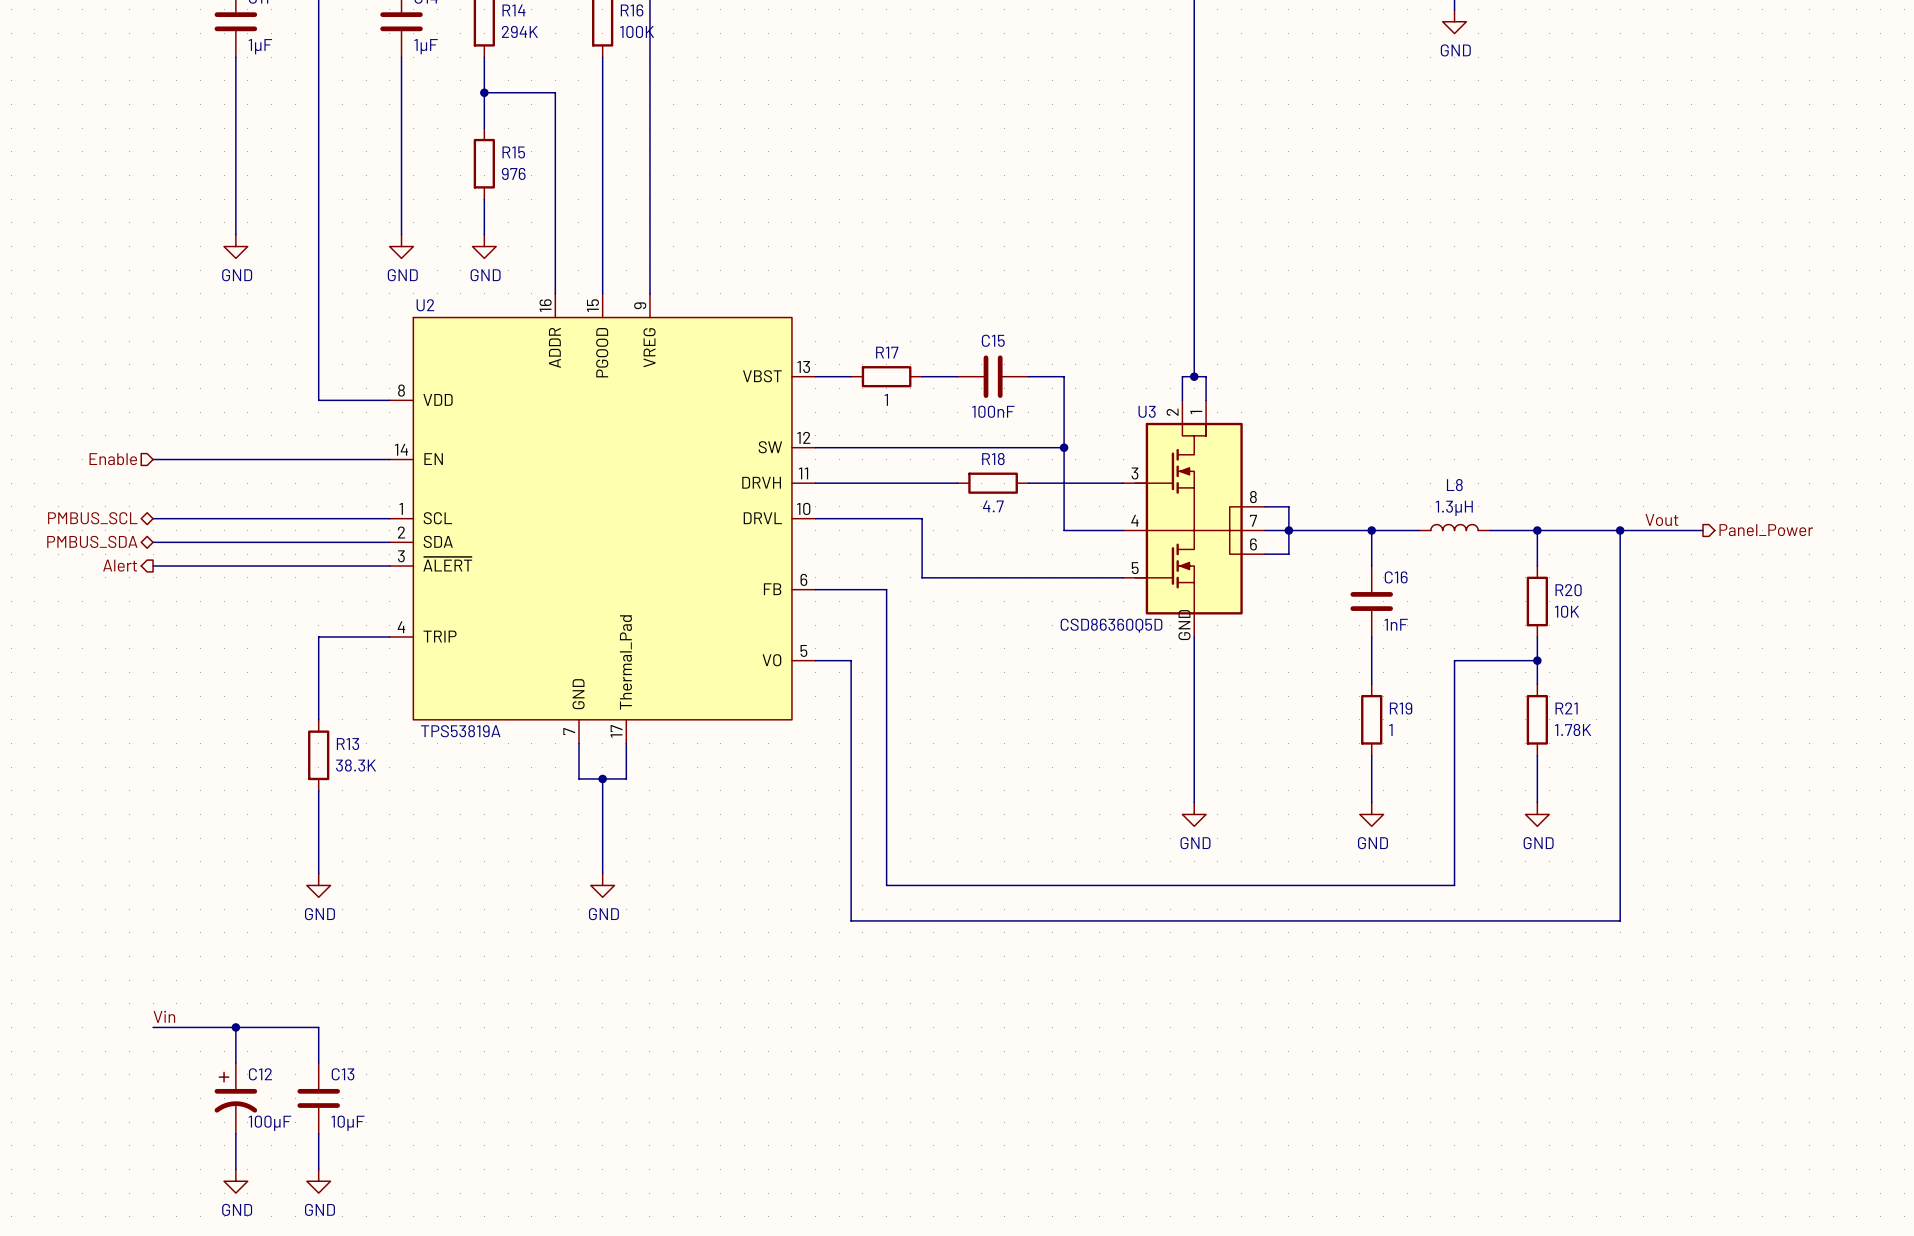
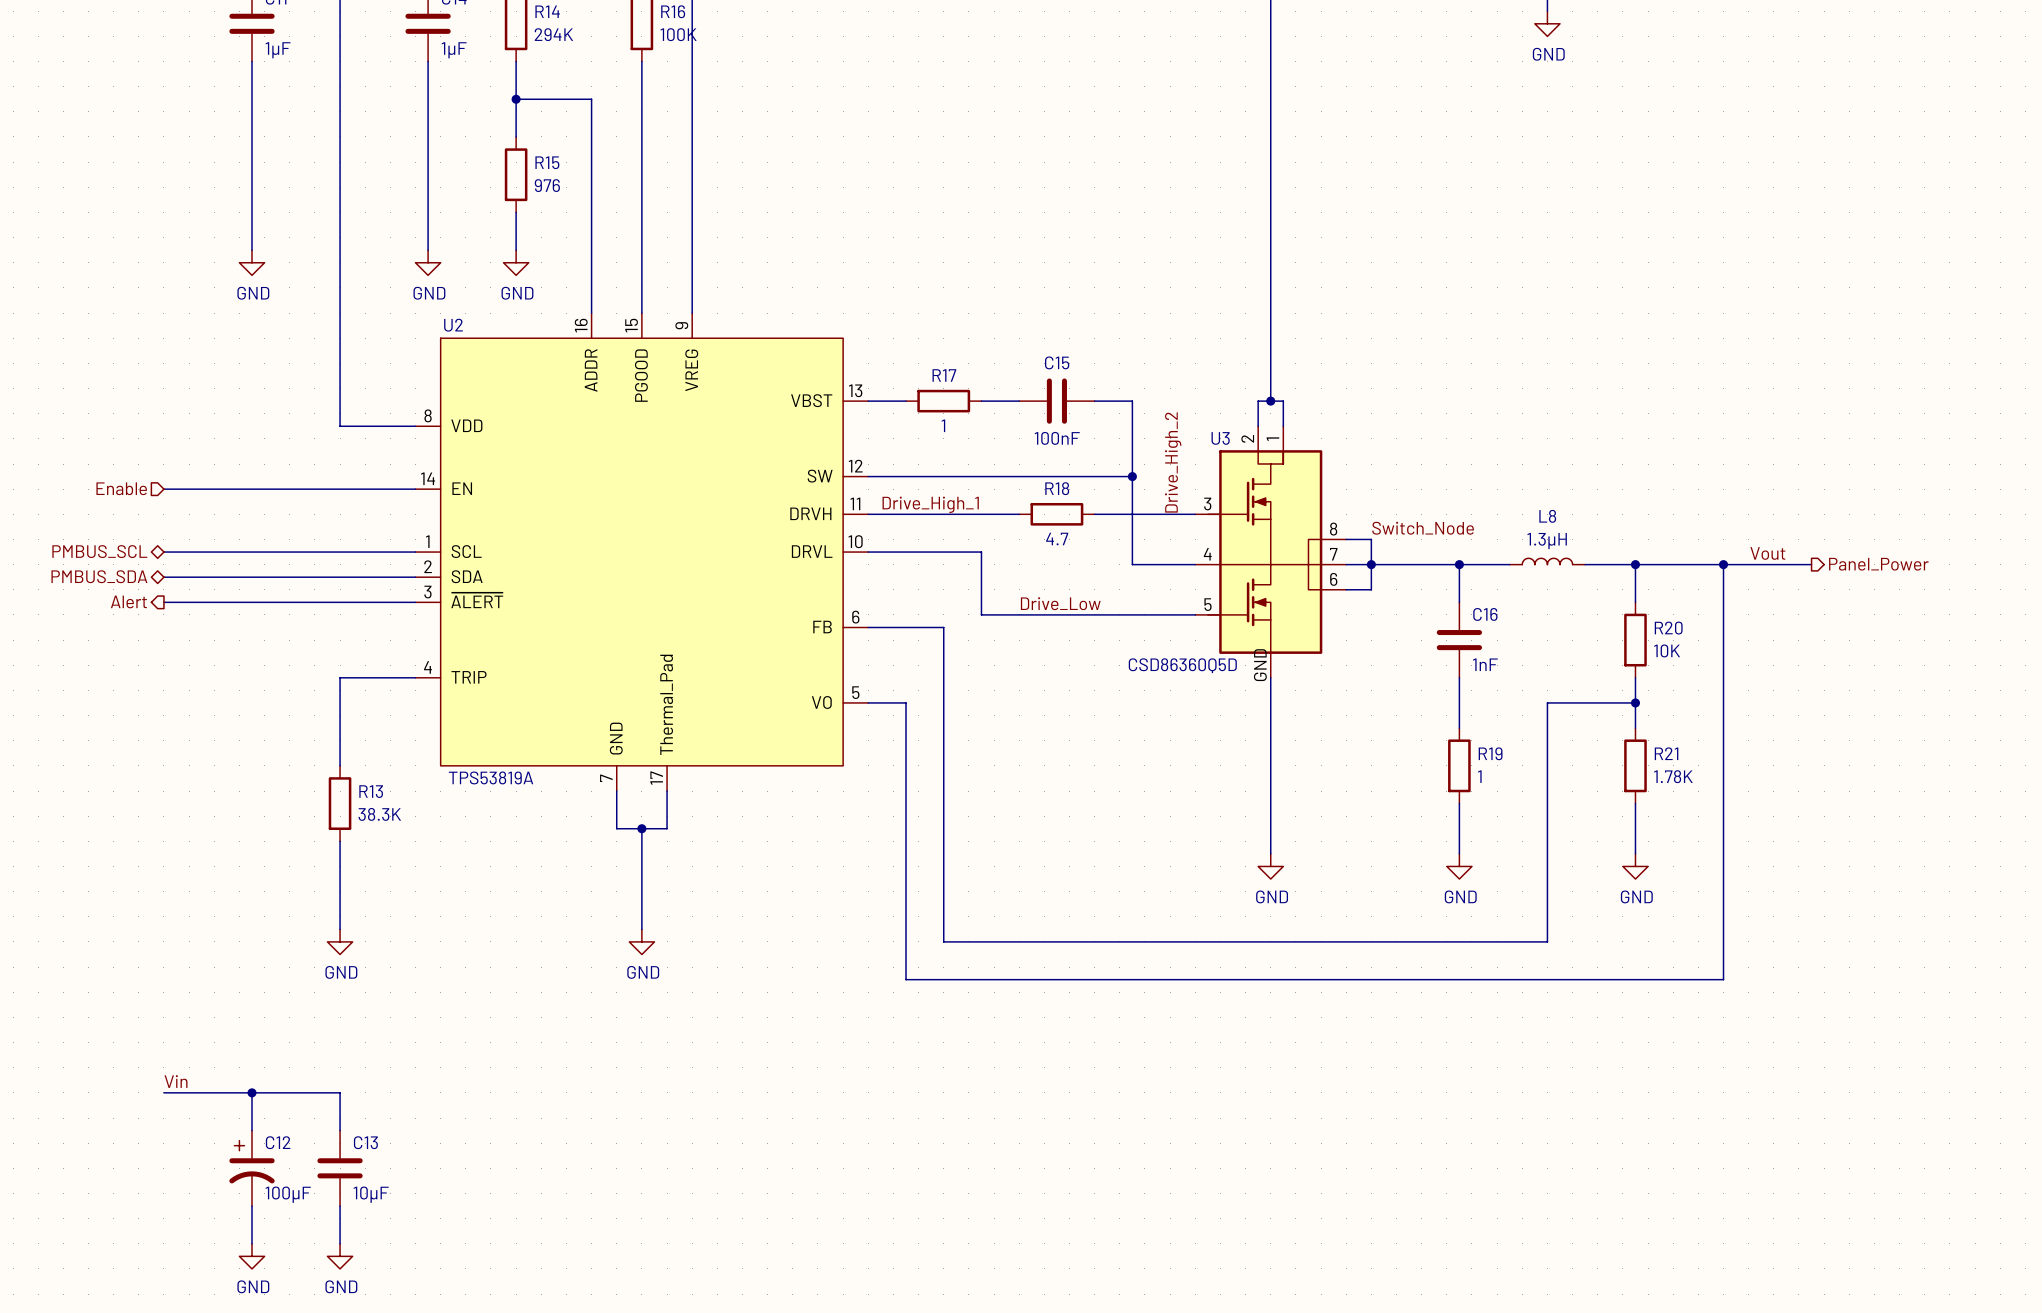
label: none -> Drive_High_2 (1173, 462)
label: none -> Drive_High_1 (930, 504)
label: none -> Switch_Node (1423, 528)
label: none -> Drive_Low (1060, 603)

